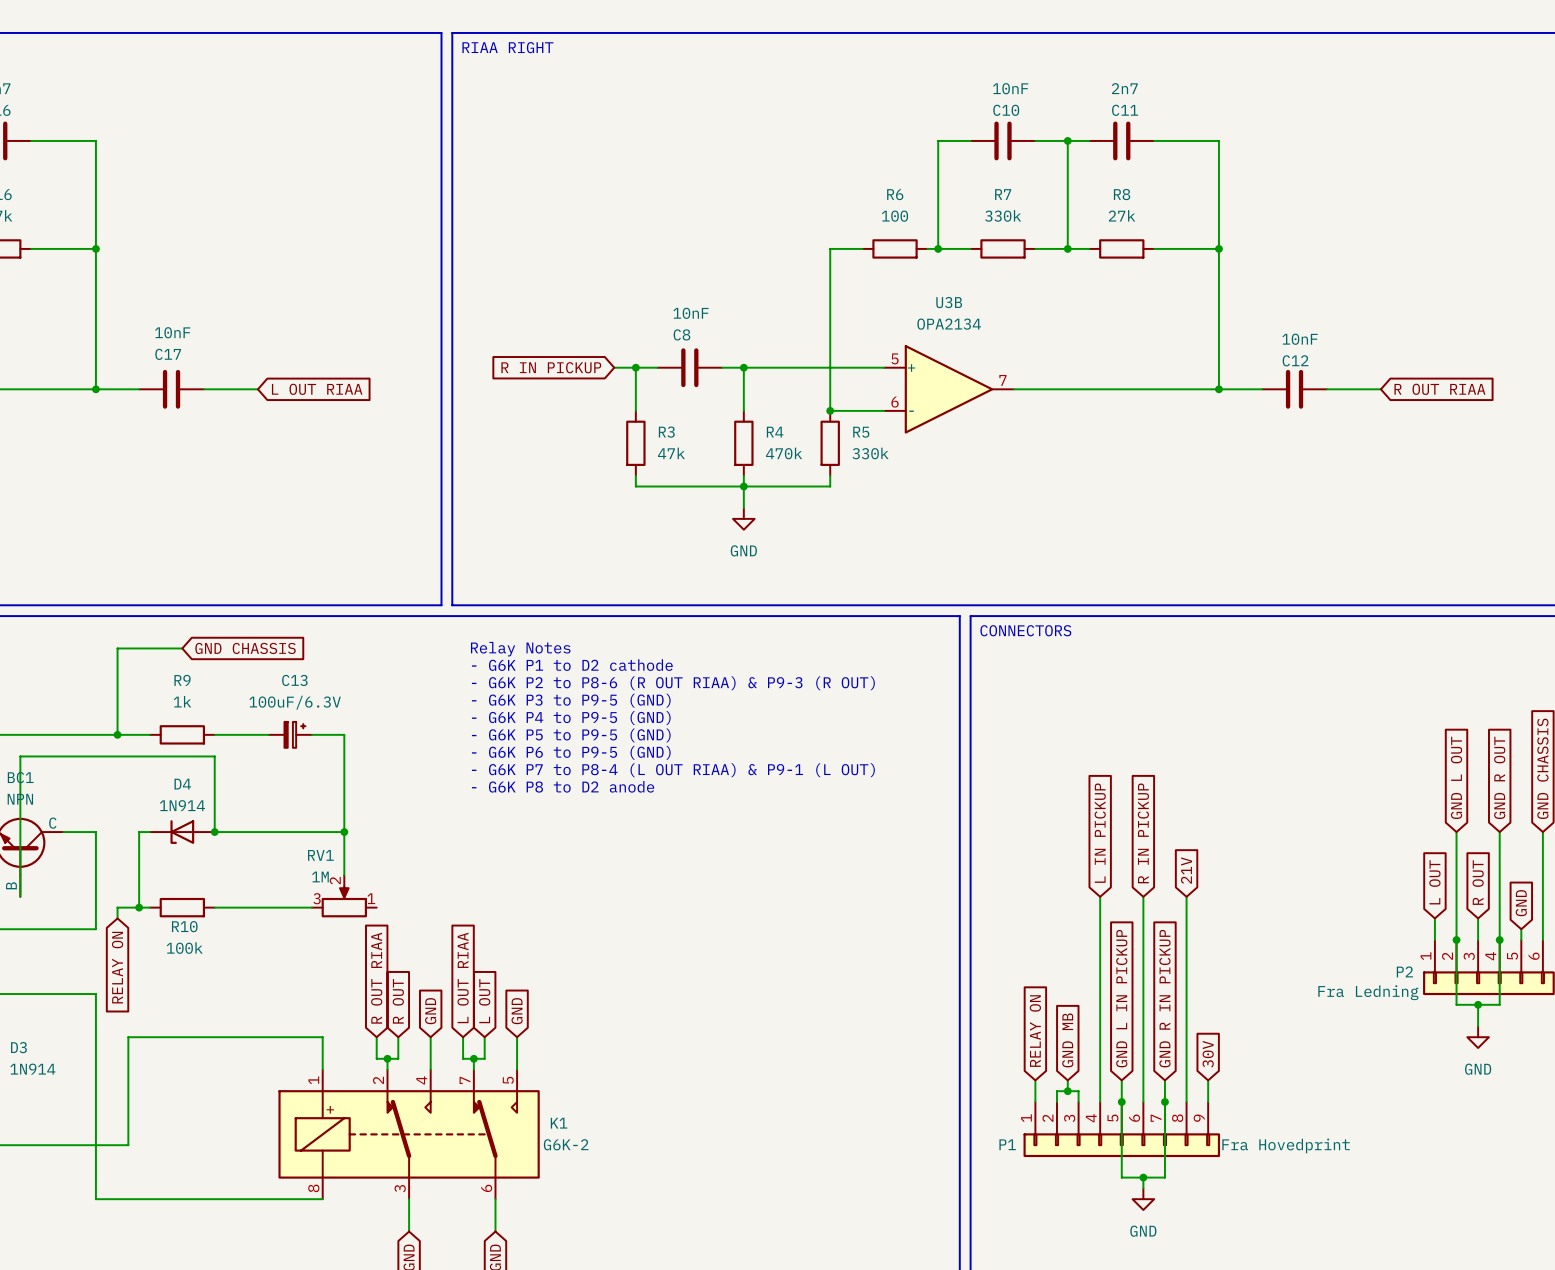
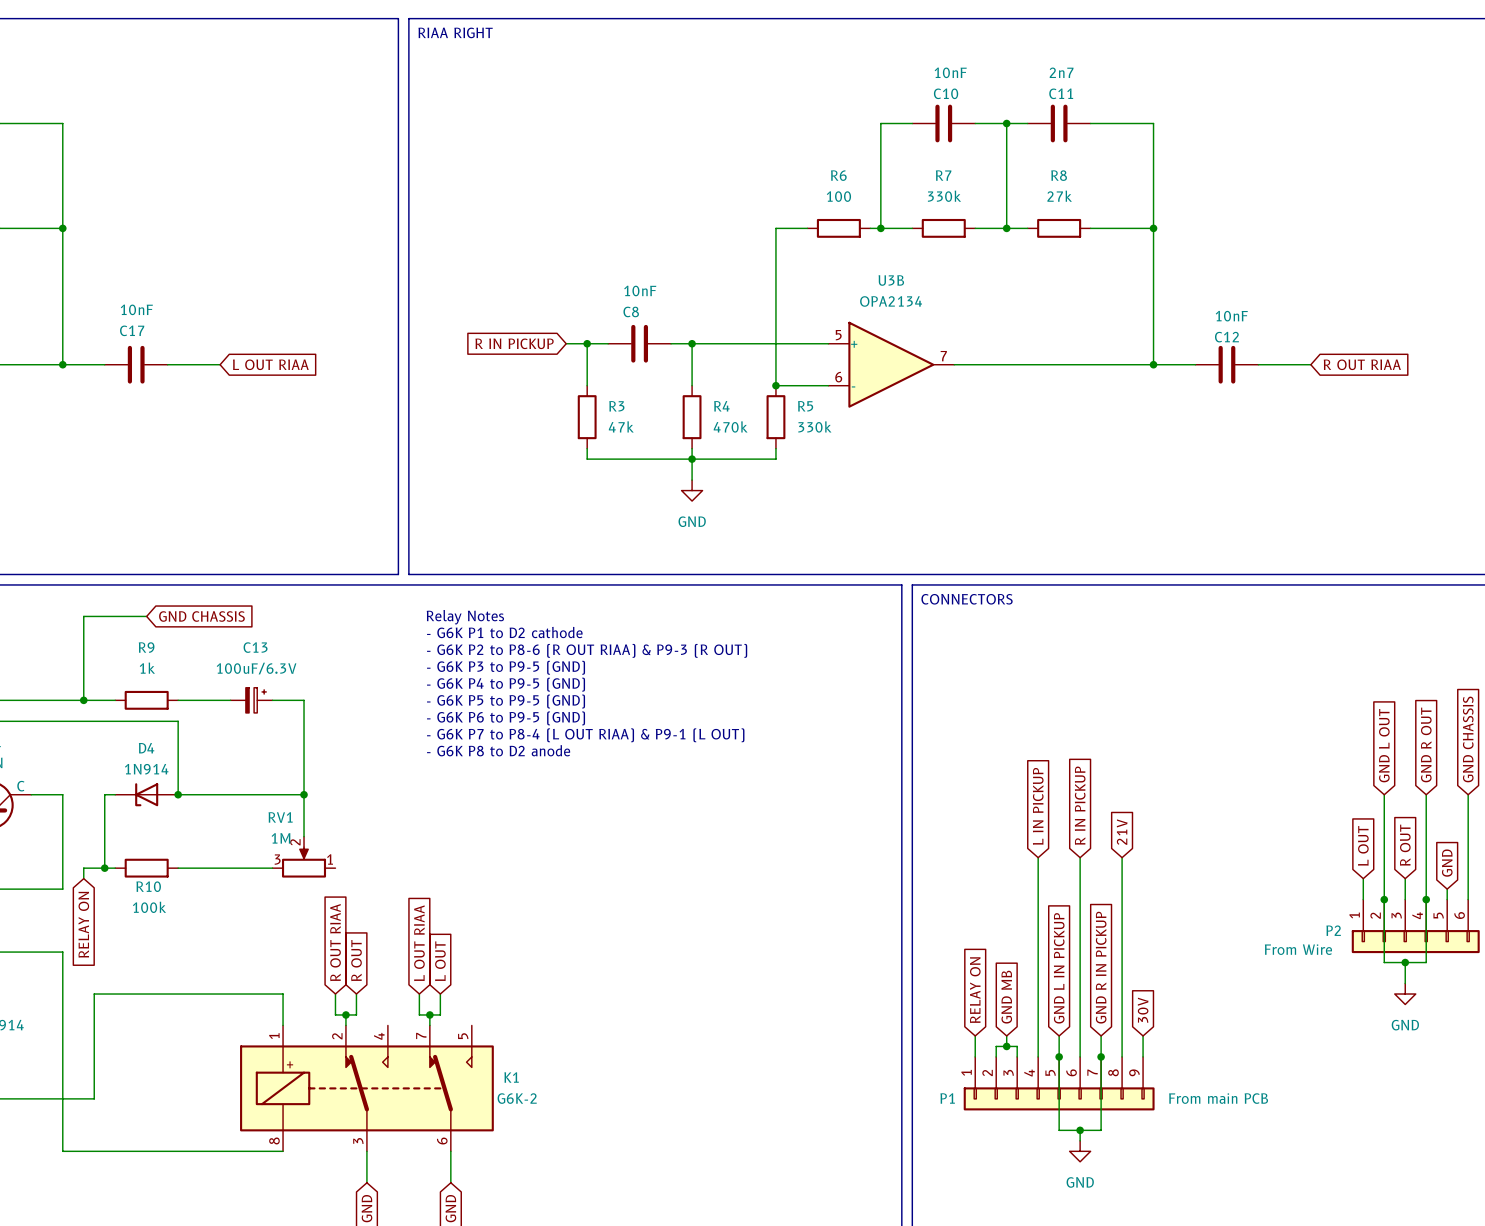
P2 value: Fra Ledning (1368, 992) -> From Wire (1298, 949)
global label: GND (430, 1011) -> none
global label: GND (517, 1011) -> none
wire: (430, 1037) (430, 1069) -> none
wire: (517, 1037) (517, 1069) -> none
P1 value: Fra Hovedprint (1286, 1145) -> From main PCB (1218, 1098)

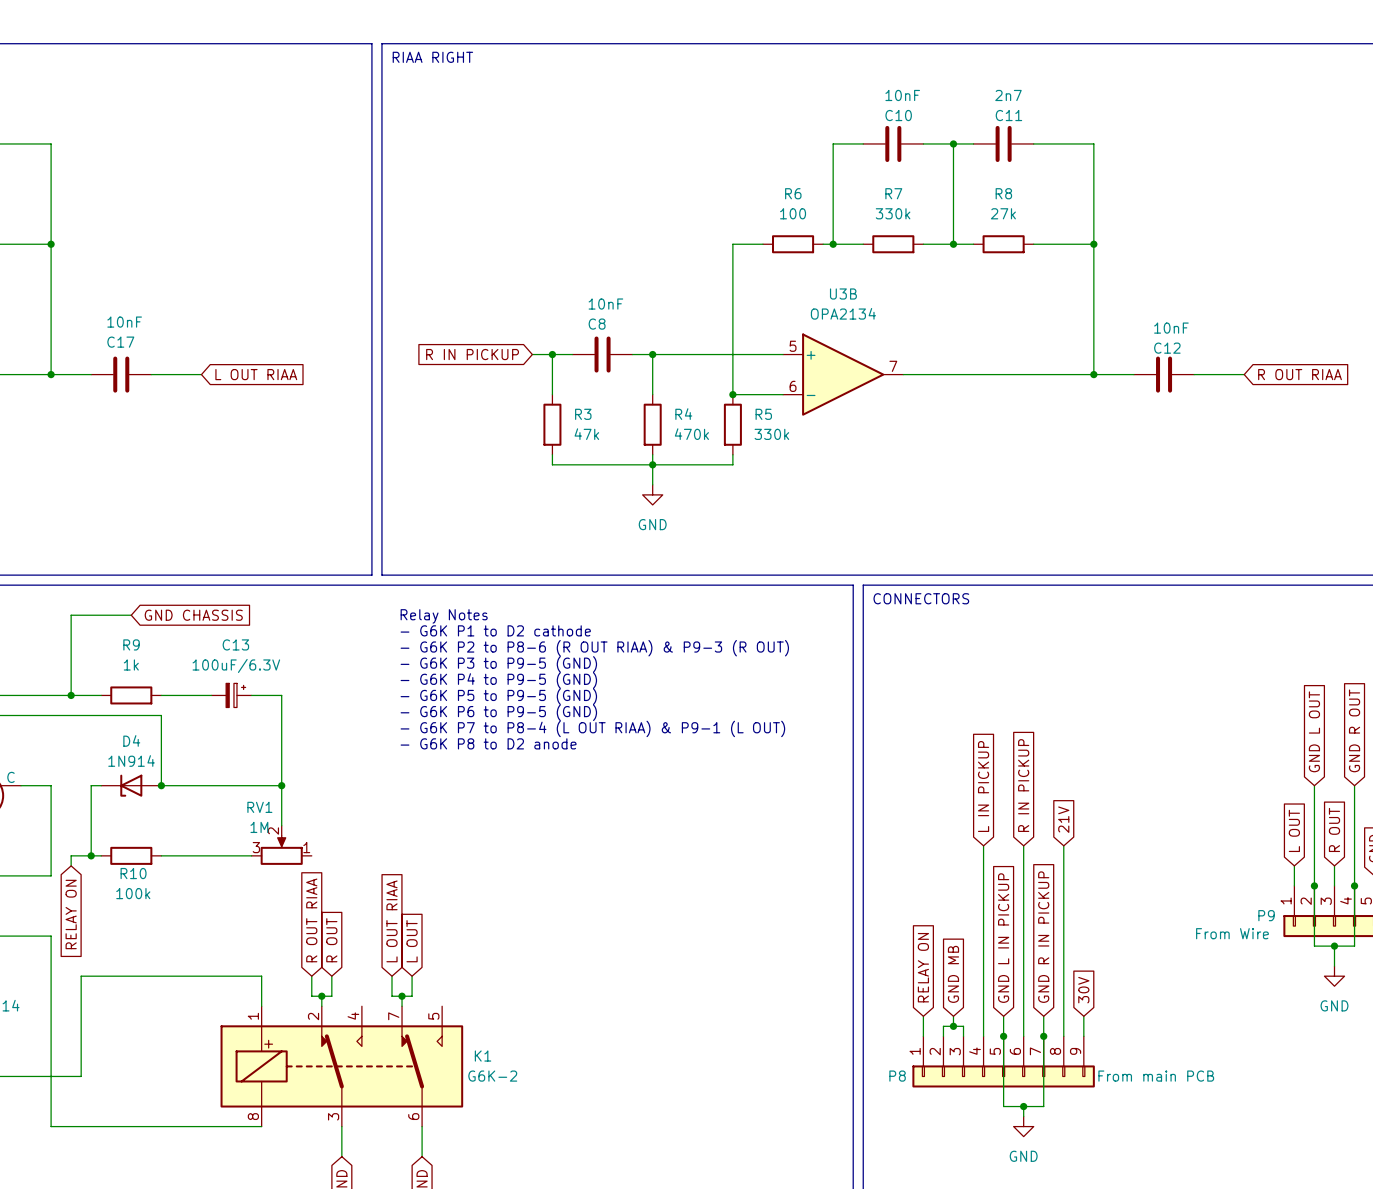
P2 name: P2 (1333, 930) -> P9 (1266, 915)
P1 name: P1 (947, 1098) -> P8 (897, 1076)

